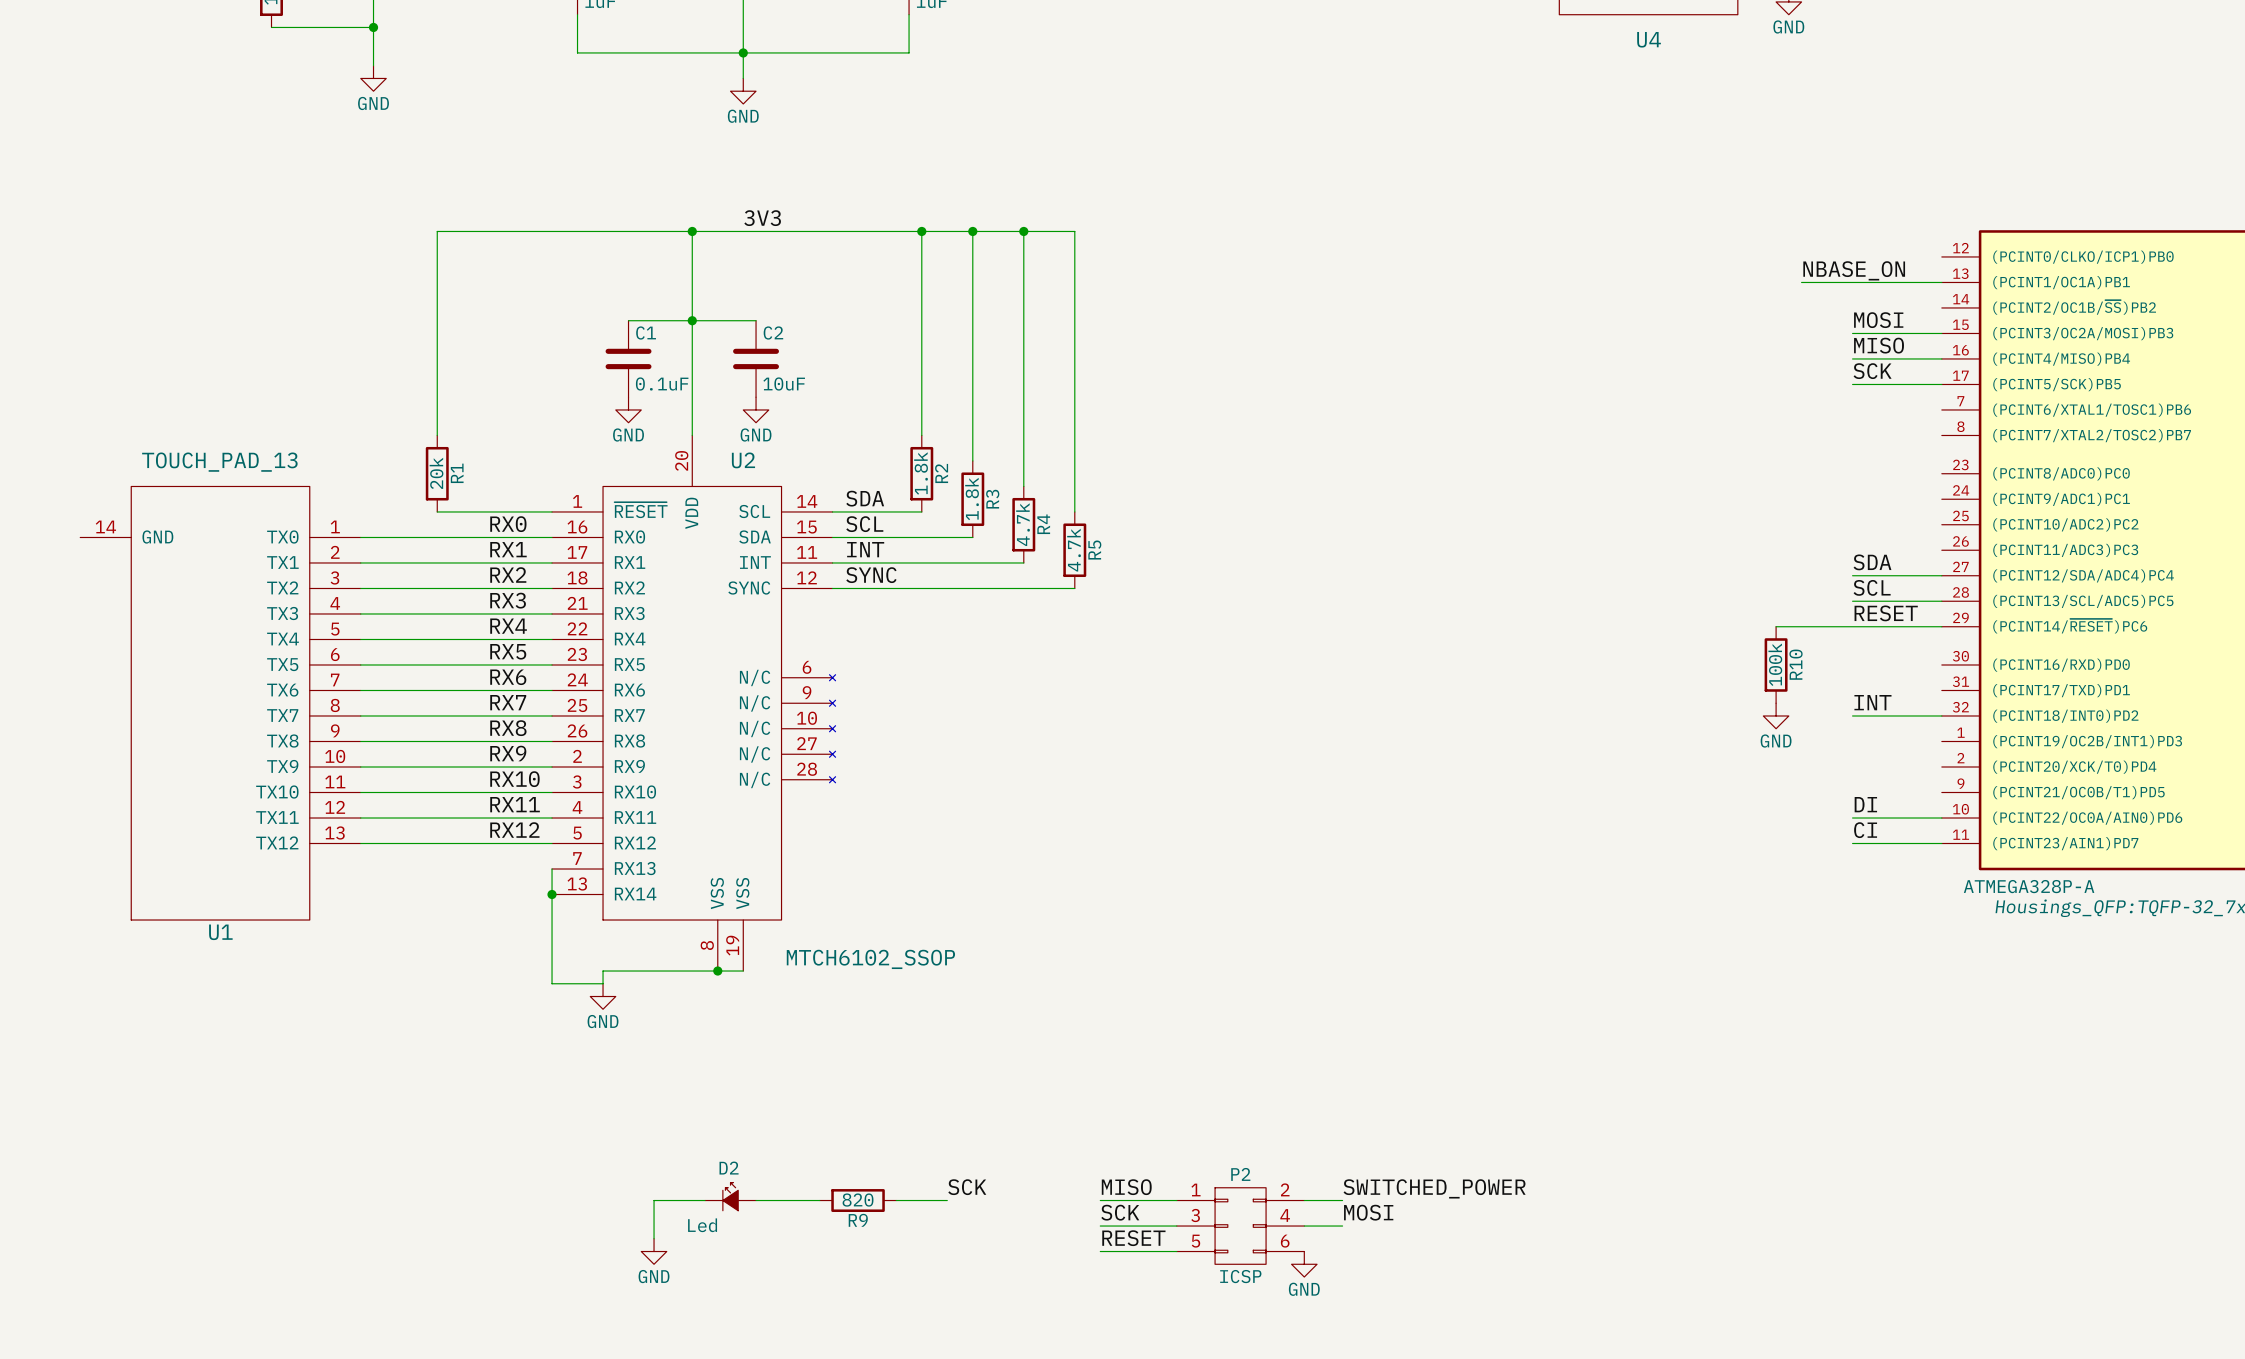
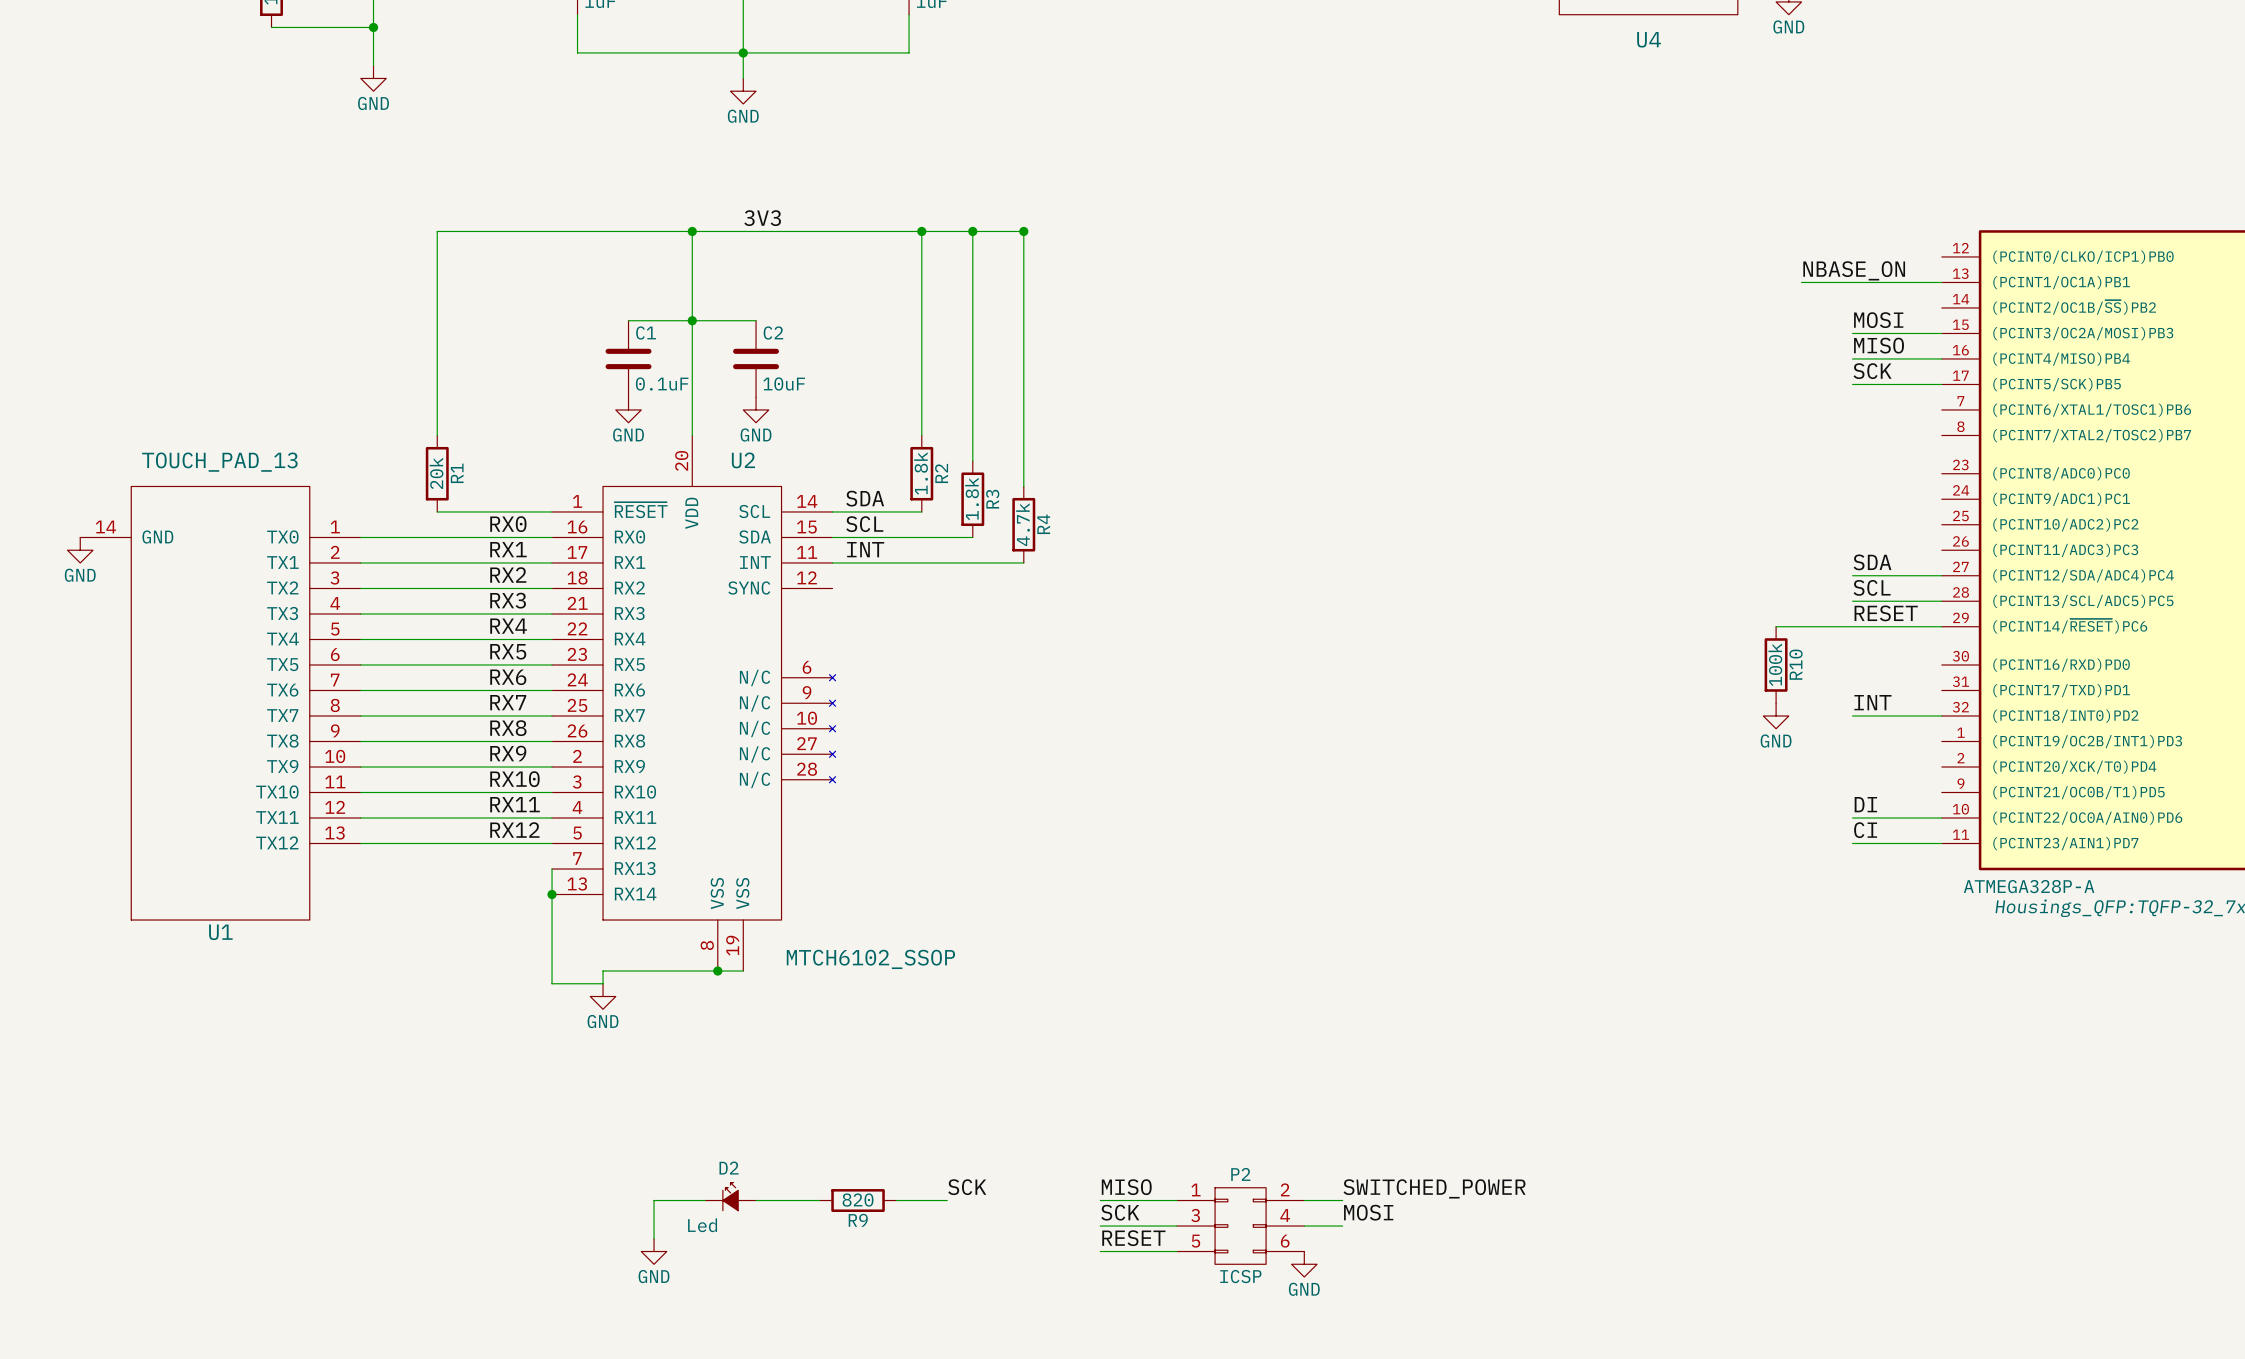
wire: (1023, 231) (1074, 231) (1074, 511) -> none
power symbol: none -> GND (80, 550)
R5: 4.7k (1074, 550) -> none
label: SYNC (871, 575) -> none
wire: (832, 588) (1074, 588) -> none

